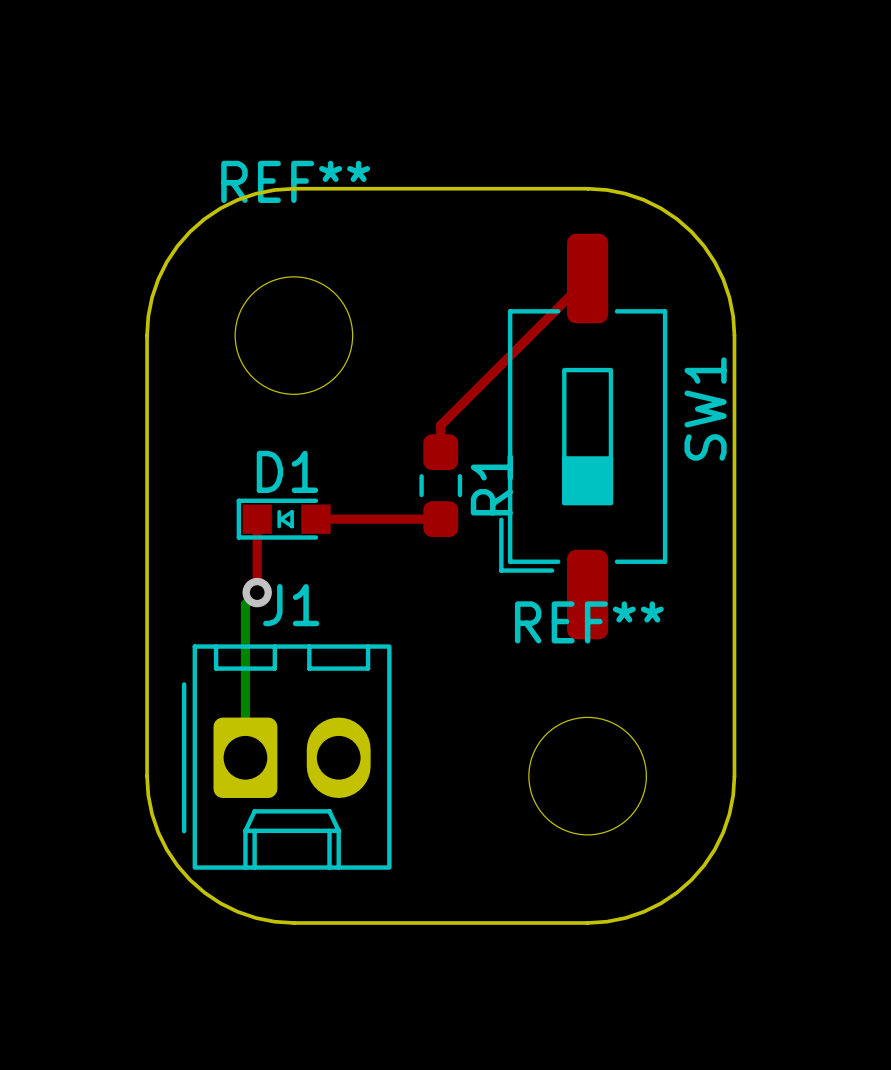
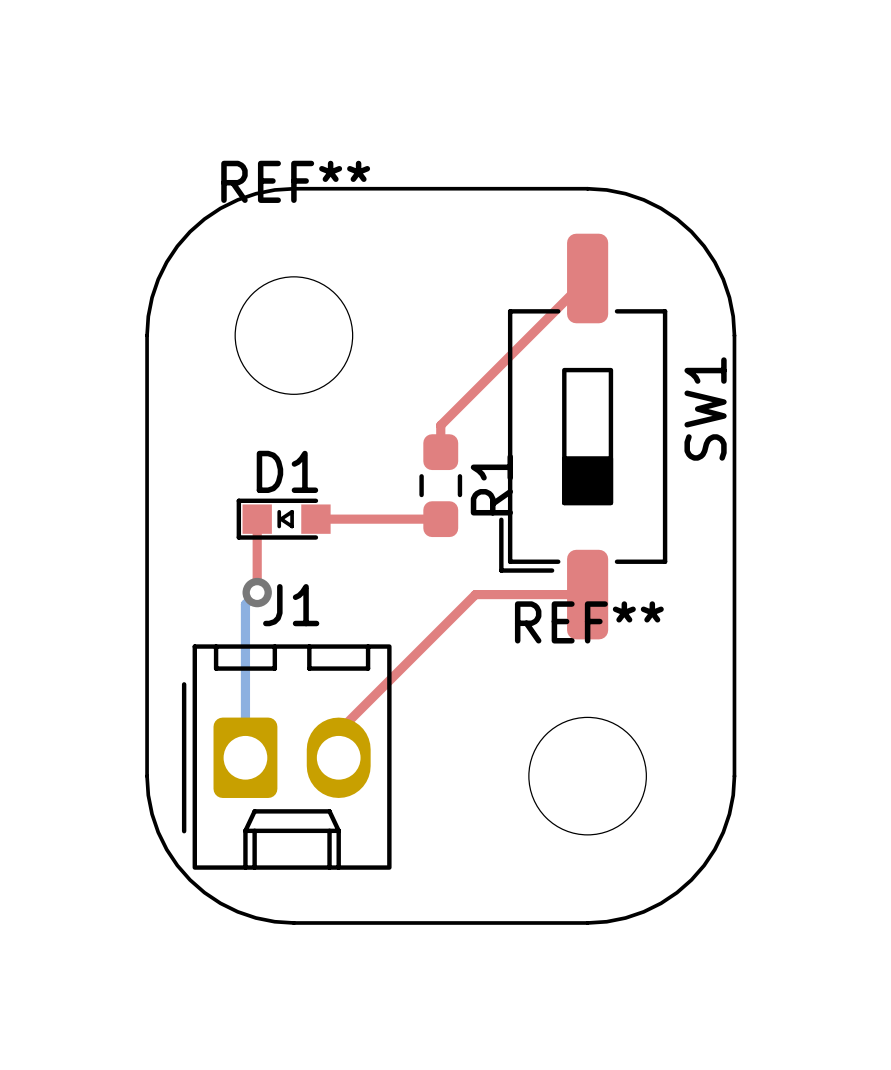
top track: none -> (587, 594) (475, 594) (338, 731) (338, 757)

